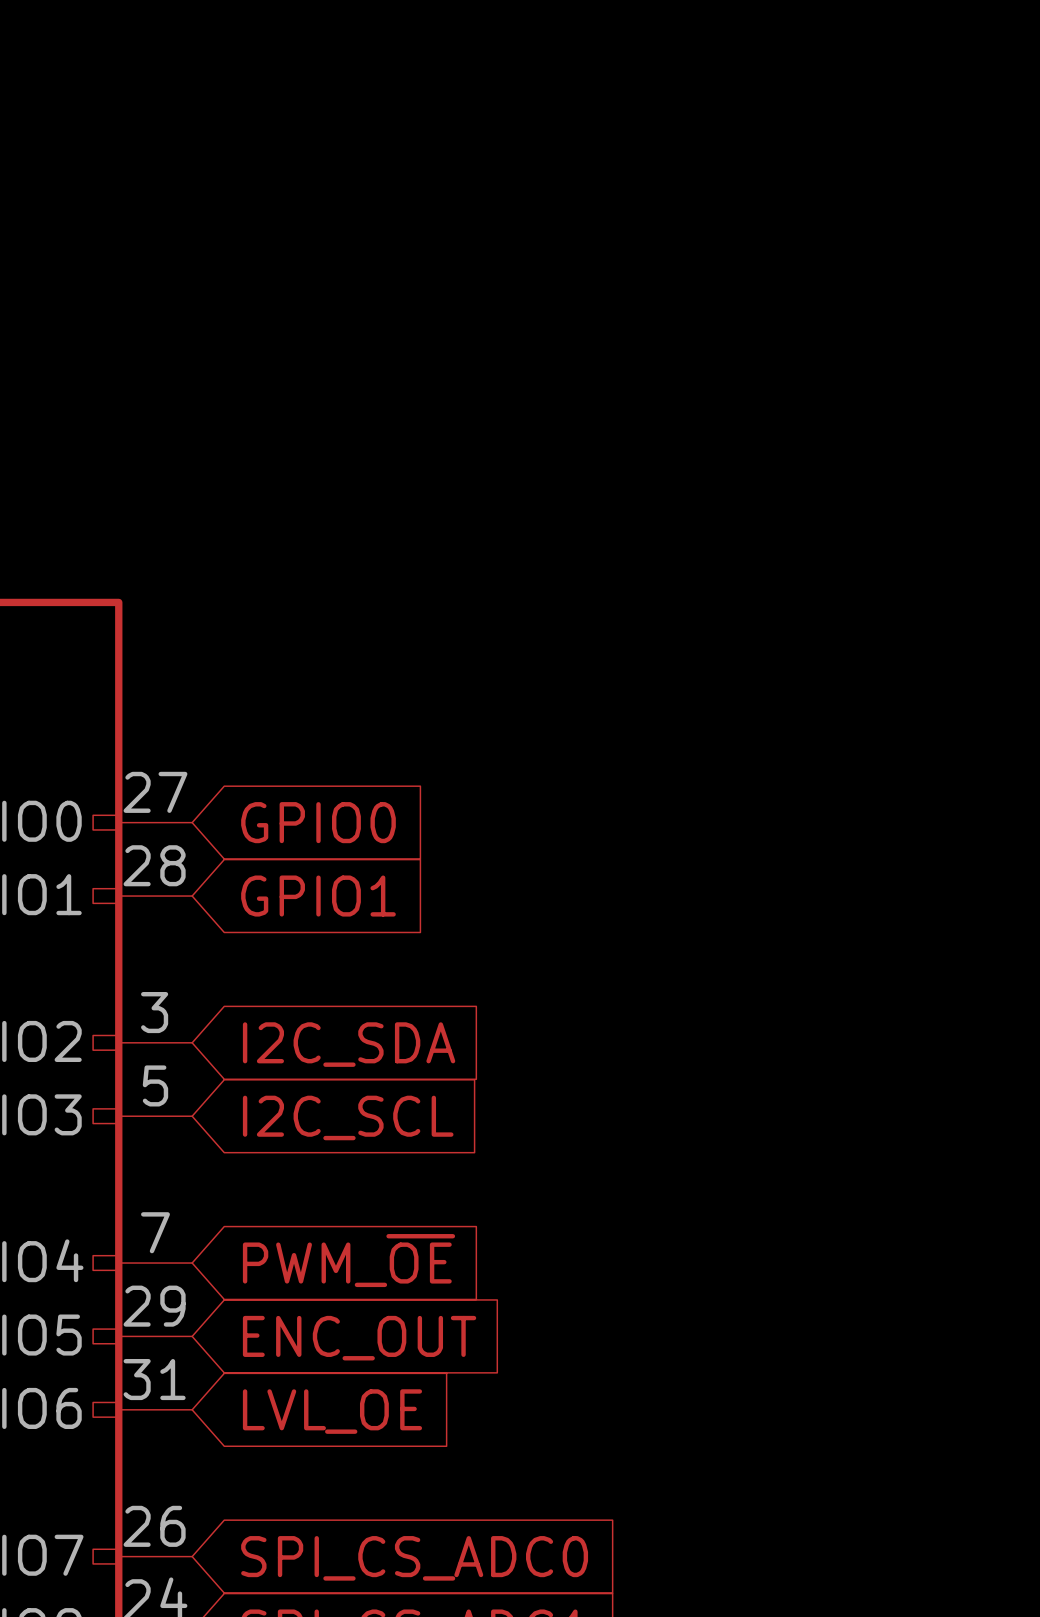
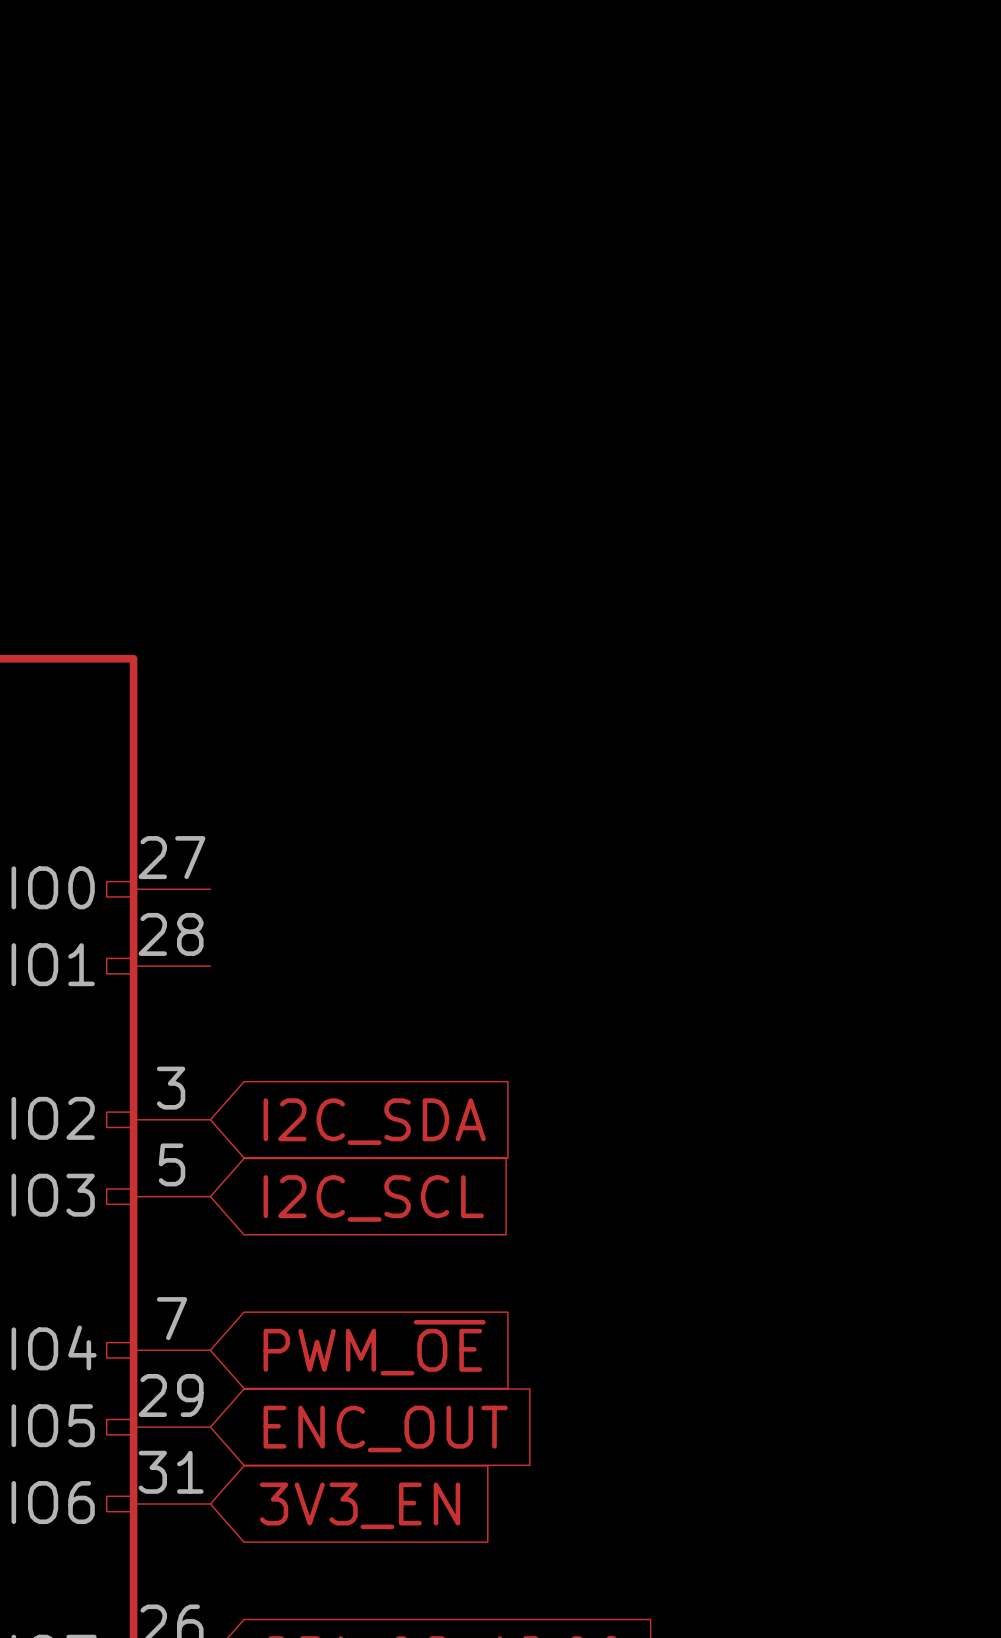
global label: GPIO0 (318, 822) -> none
global label: GPIO1 (318, 896) -> none
global label: LVL_OE (332, 1411) -> 3V3_EN (360, 1505)

